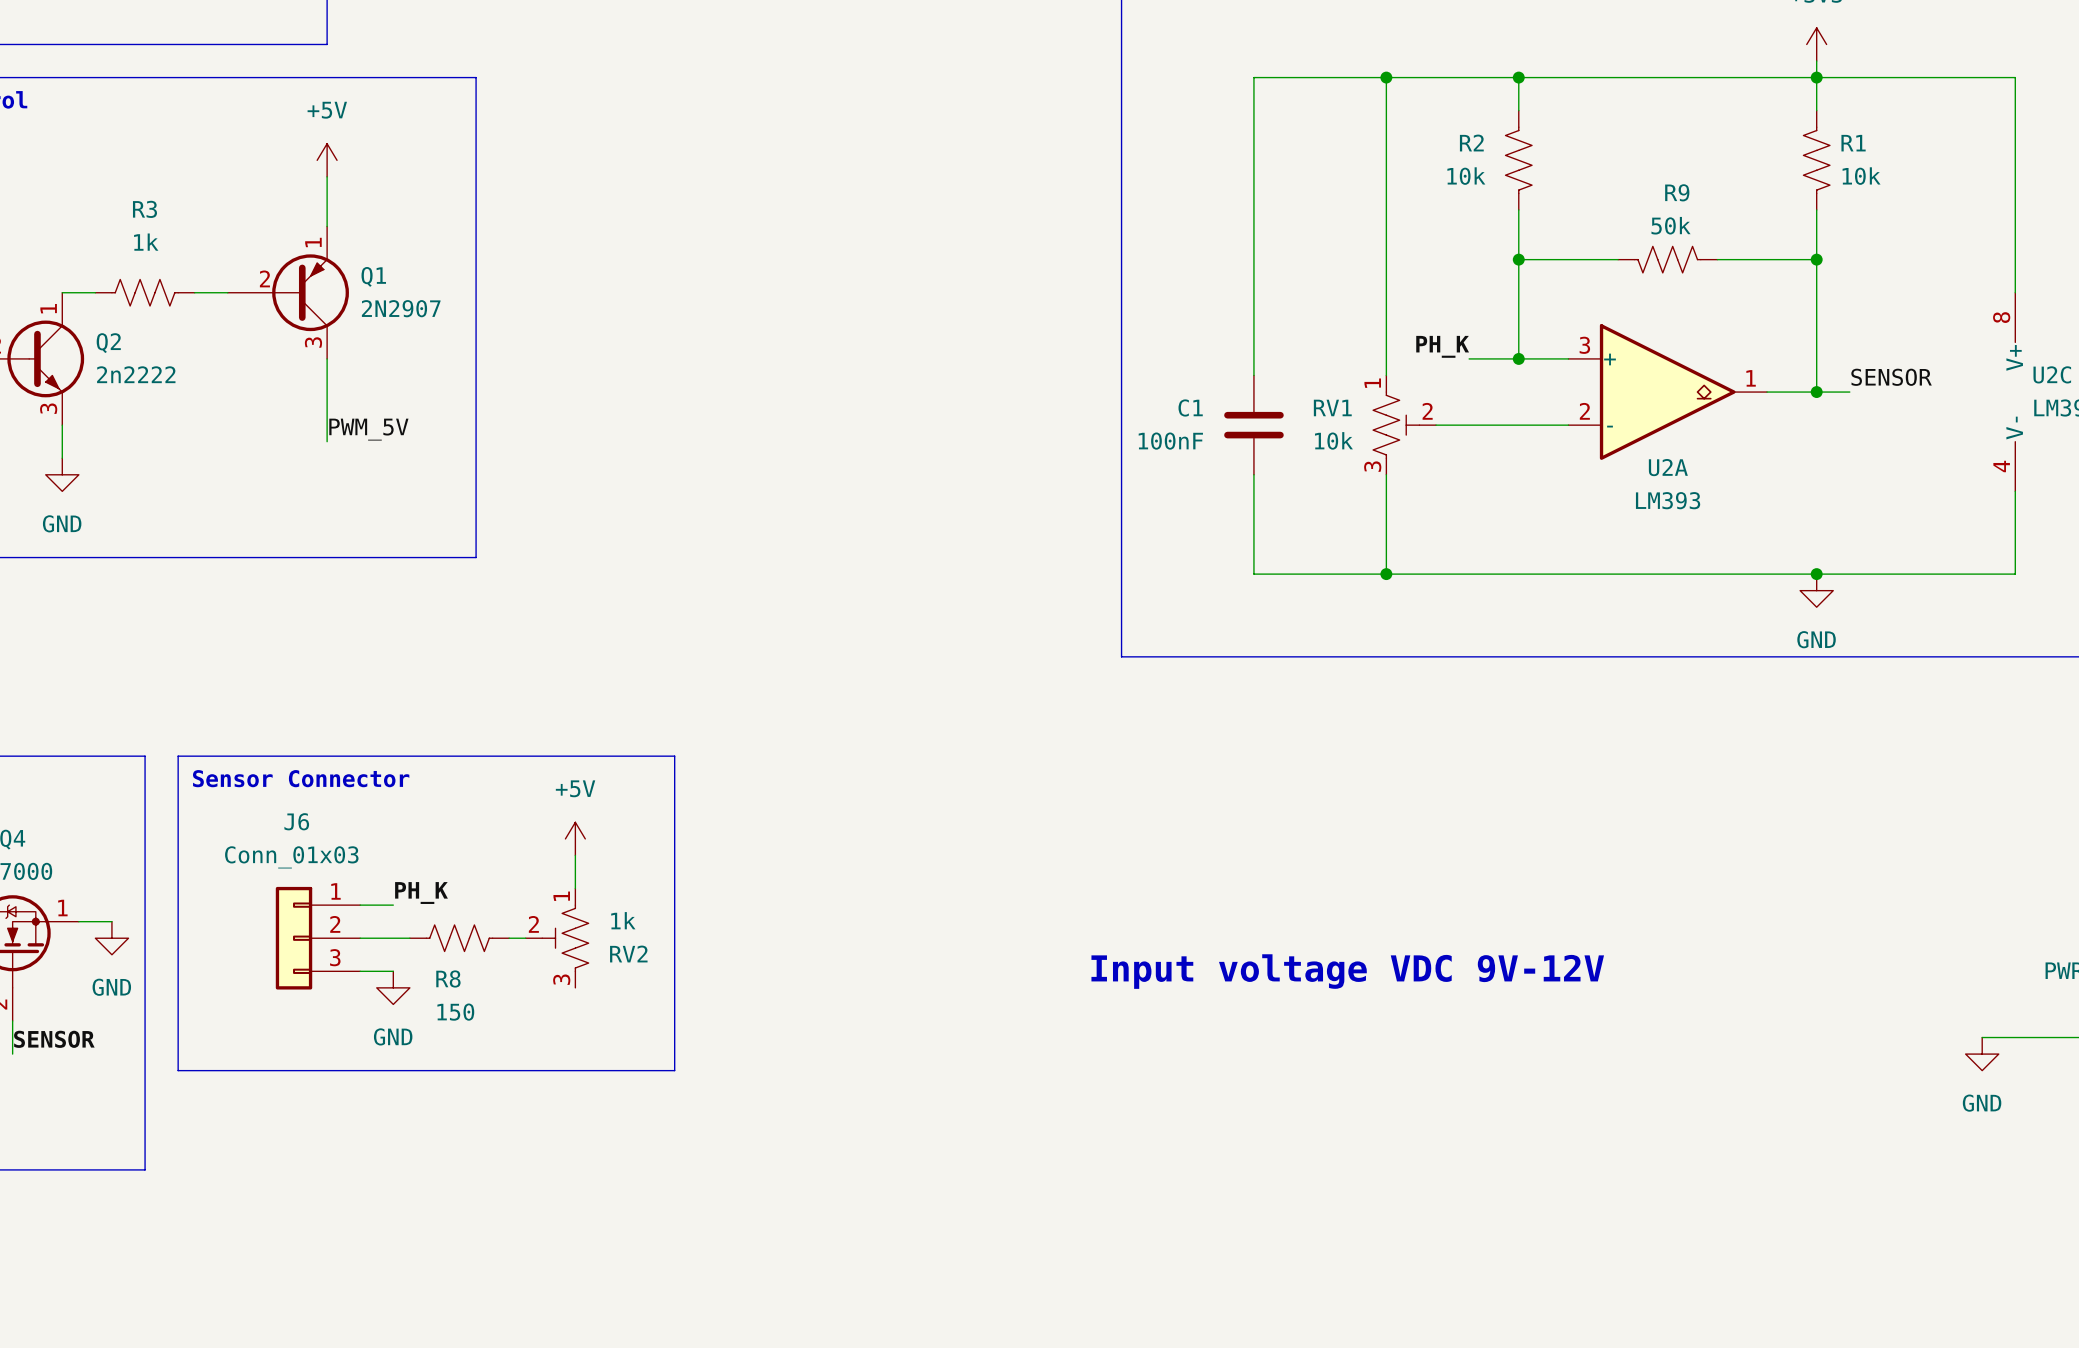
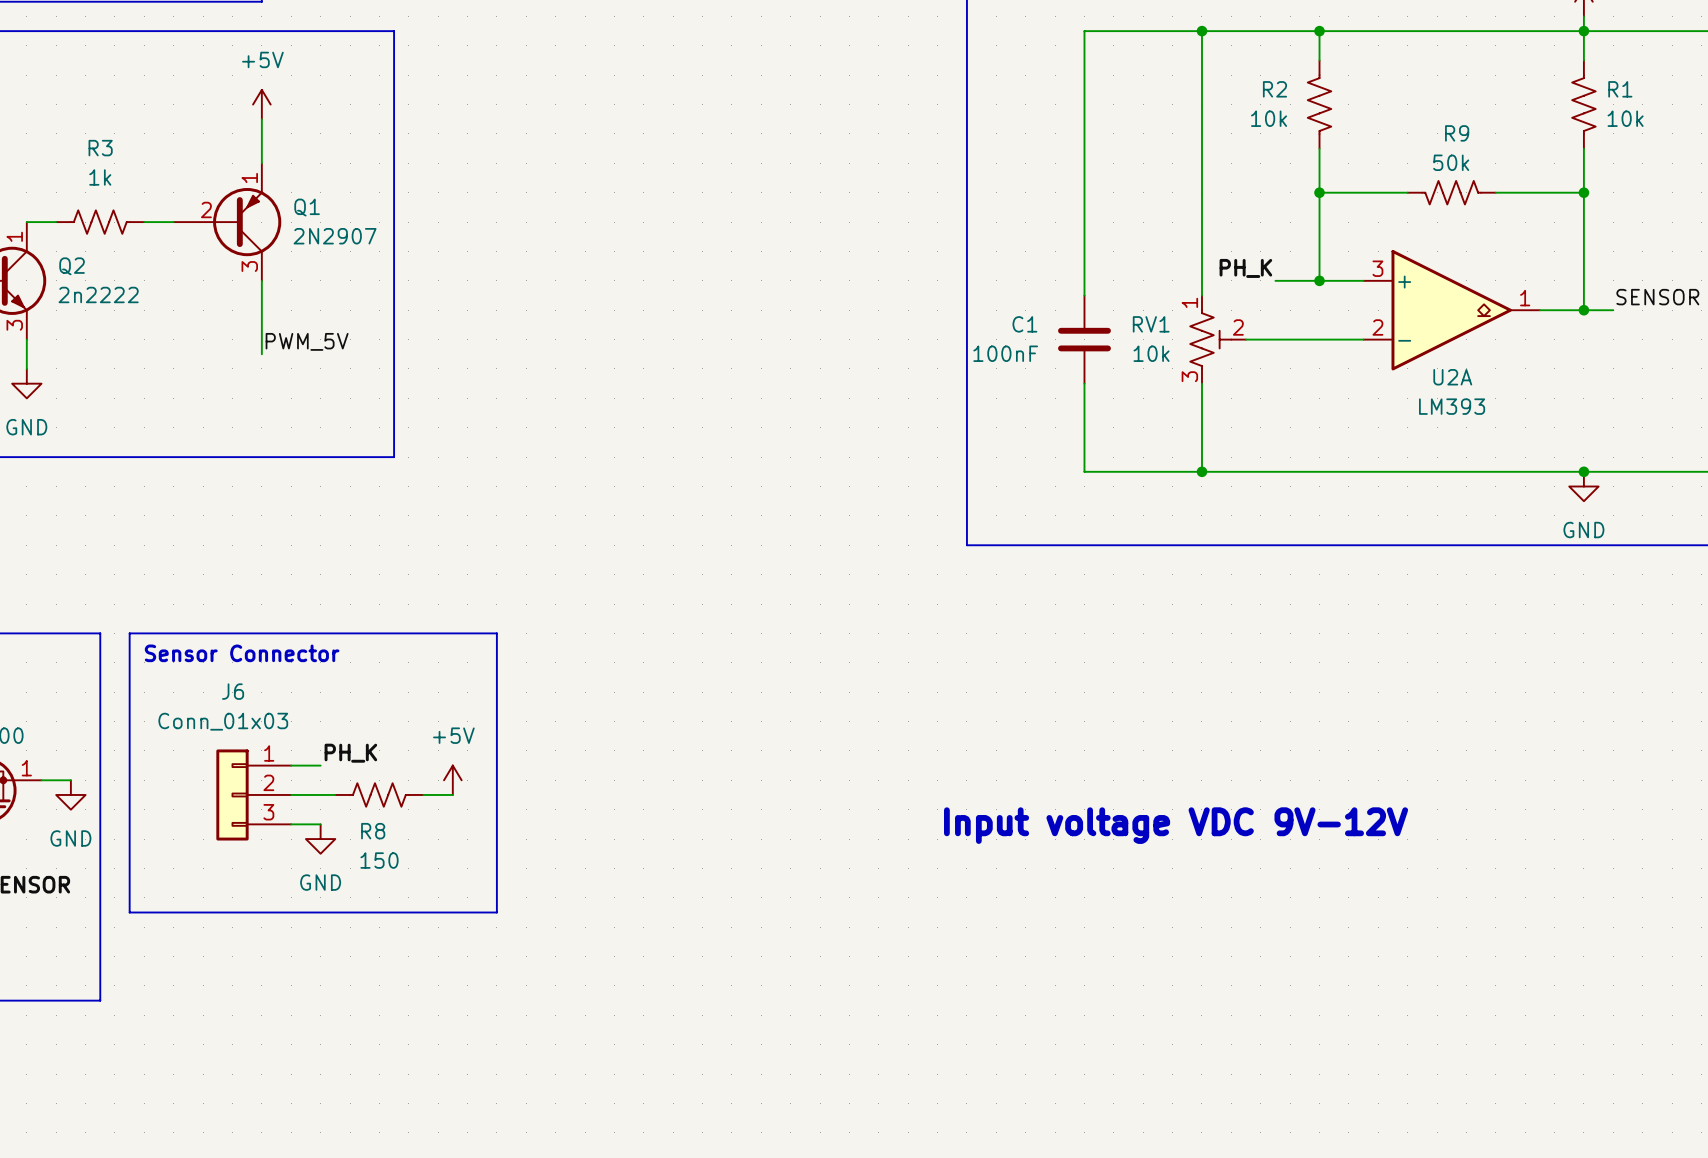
line: (591, 756) (674, 756) (674, 1070) (591, 1070) -> (496, 633) (496, 912)
power symbol position: +5V (575, 838) -> +5V (452, 780)
wire: (575, 855) (575, 888) -> none
RV2: 1k (557, 938) -> none

